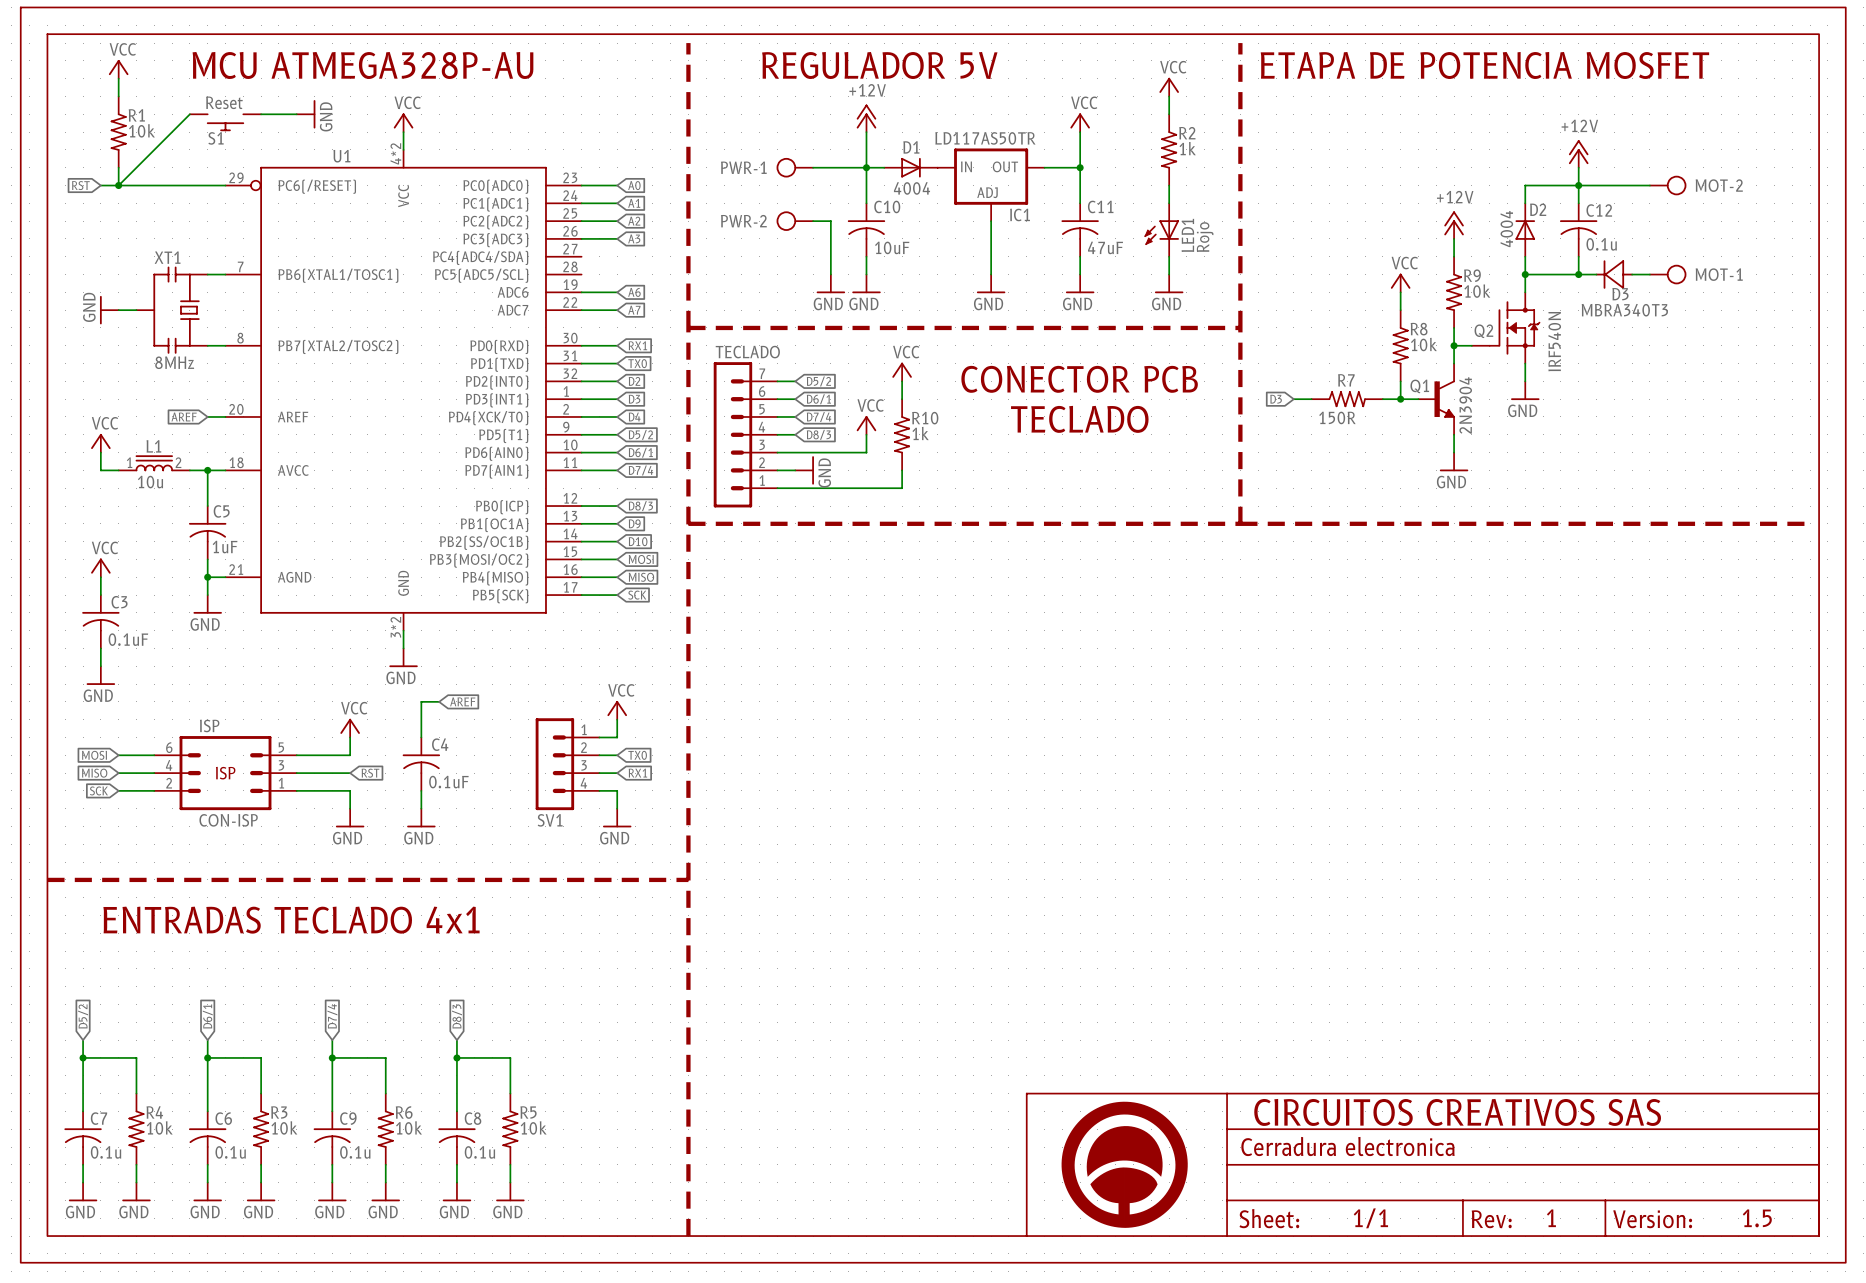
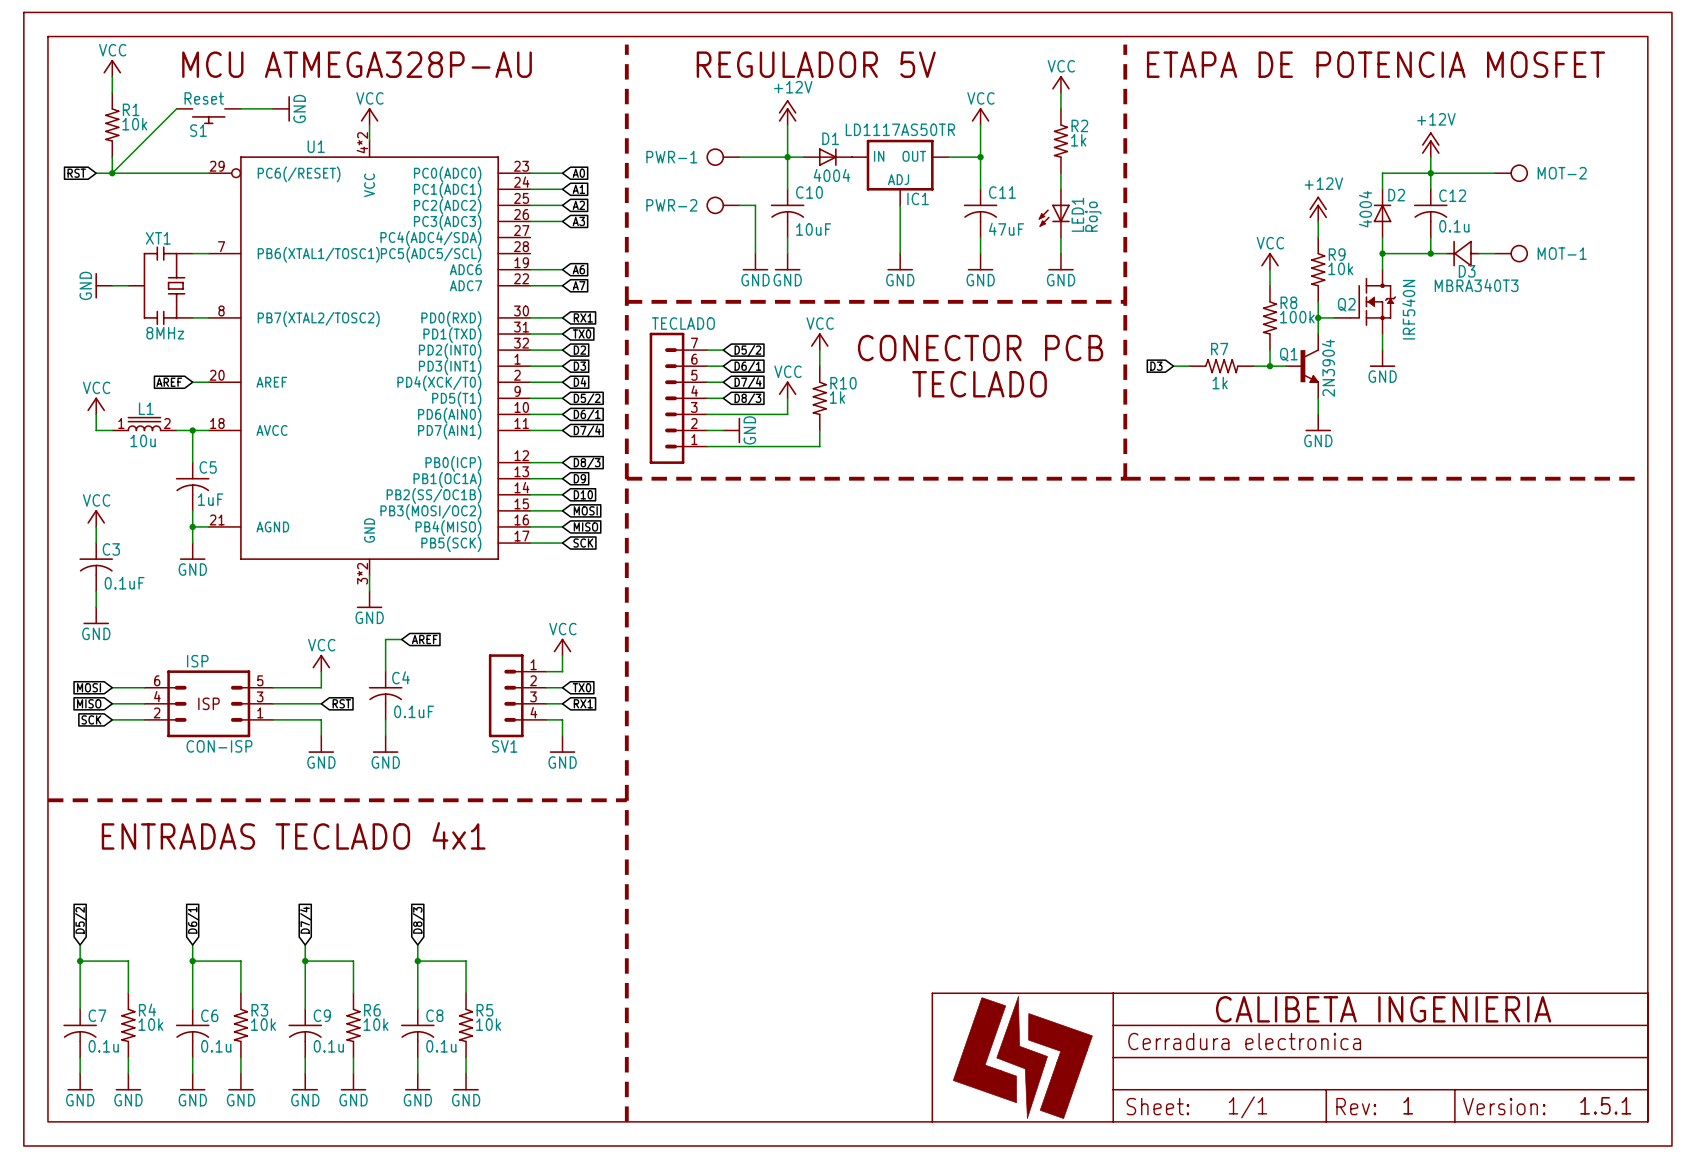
part symbol: [20, 7, 1846, 1263] -> [23, 12, 1672, 1147]
IC1 value: LD117AS50TR (985, 138) -> LD1117AS50TR (900, 129)
IC1 name position: IC1 (1020, 214) -> IC1 (918, 198)
R8 value: 10k (1423, 344) -> 100k (1297, 317)
R7 value: 150R (1337, 417) -> 1k (1220, 383)
text: 1.5 (1757, 1218) -> 1.5.1 (1605, 1105)

